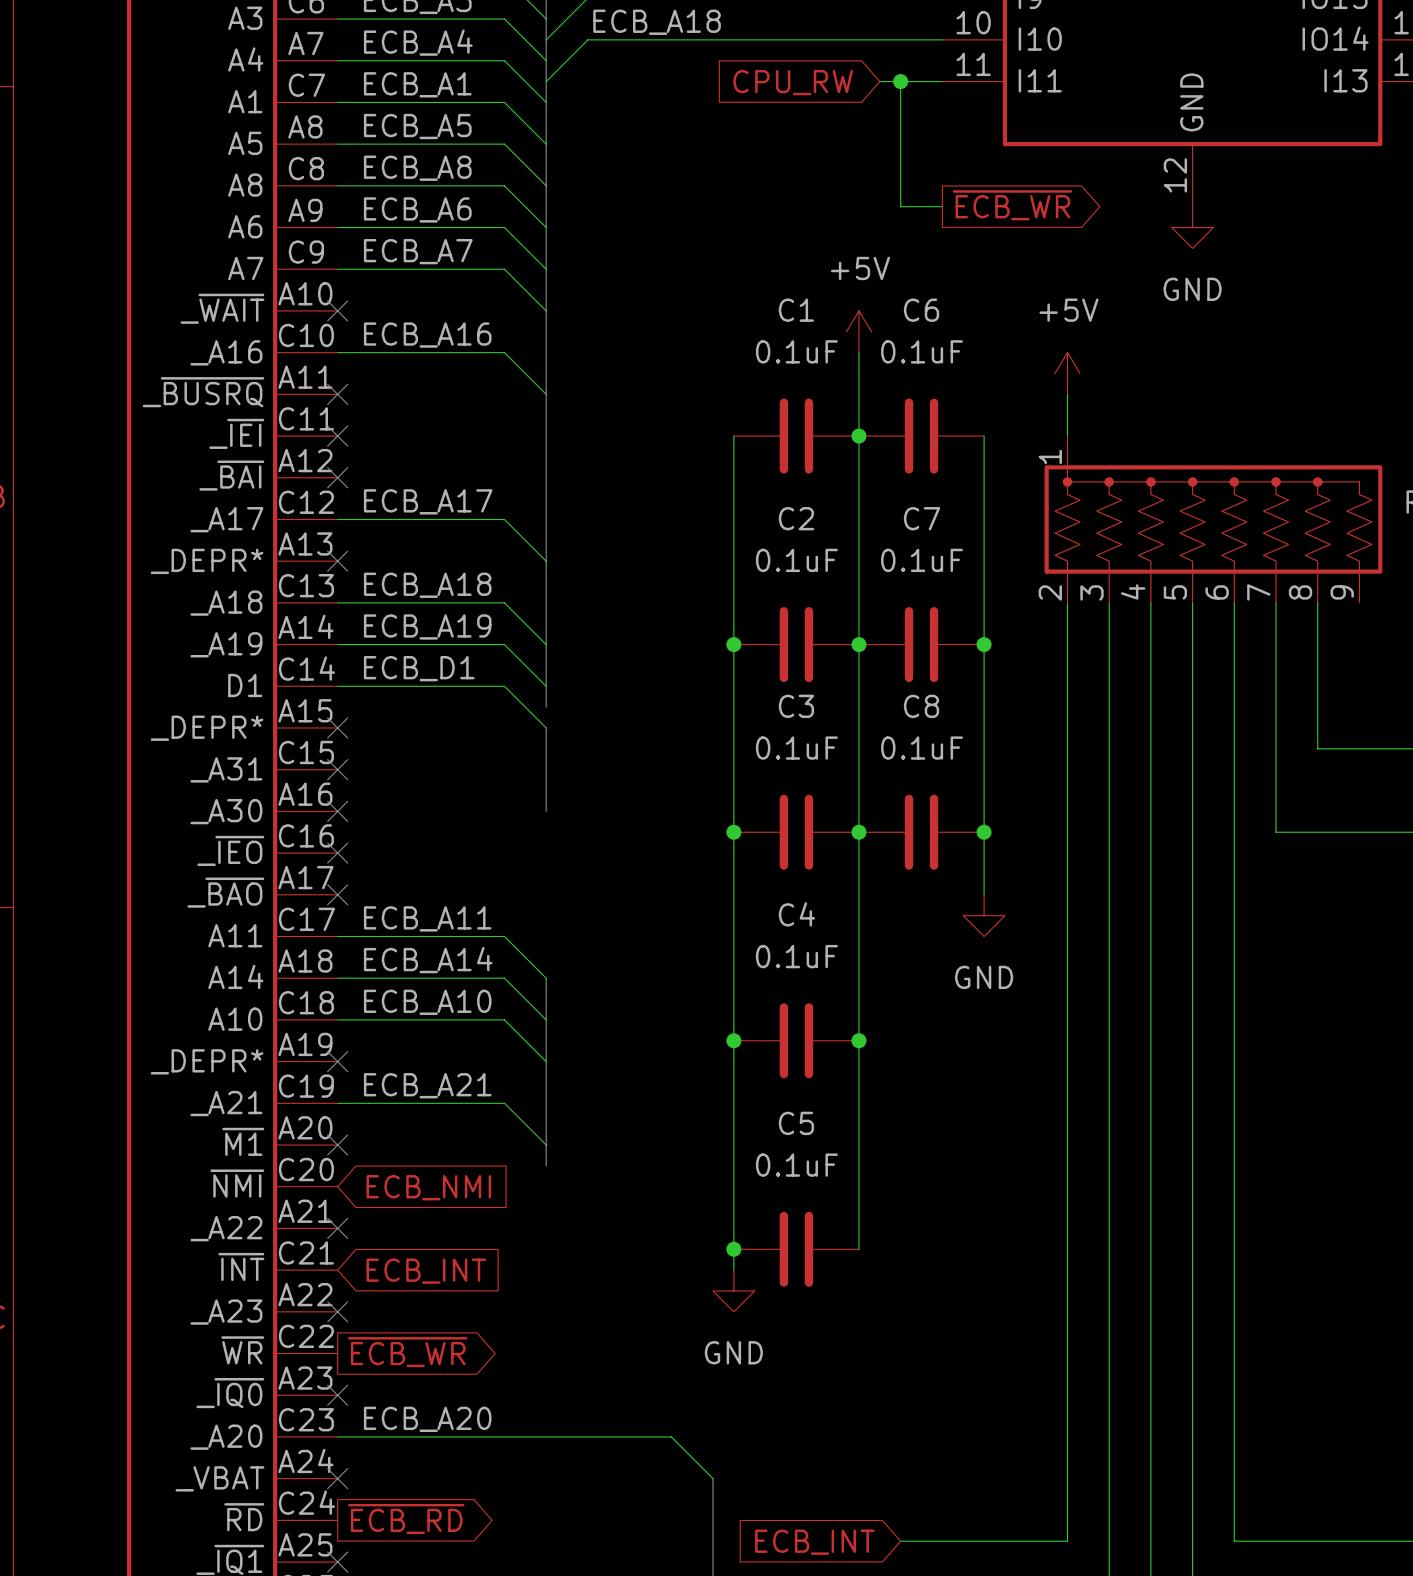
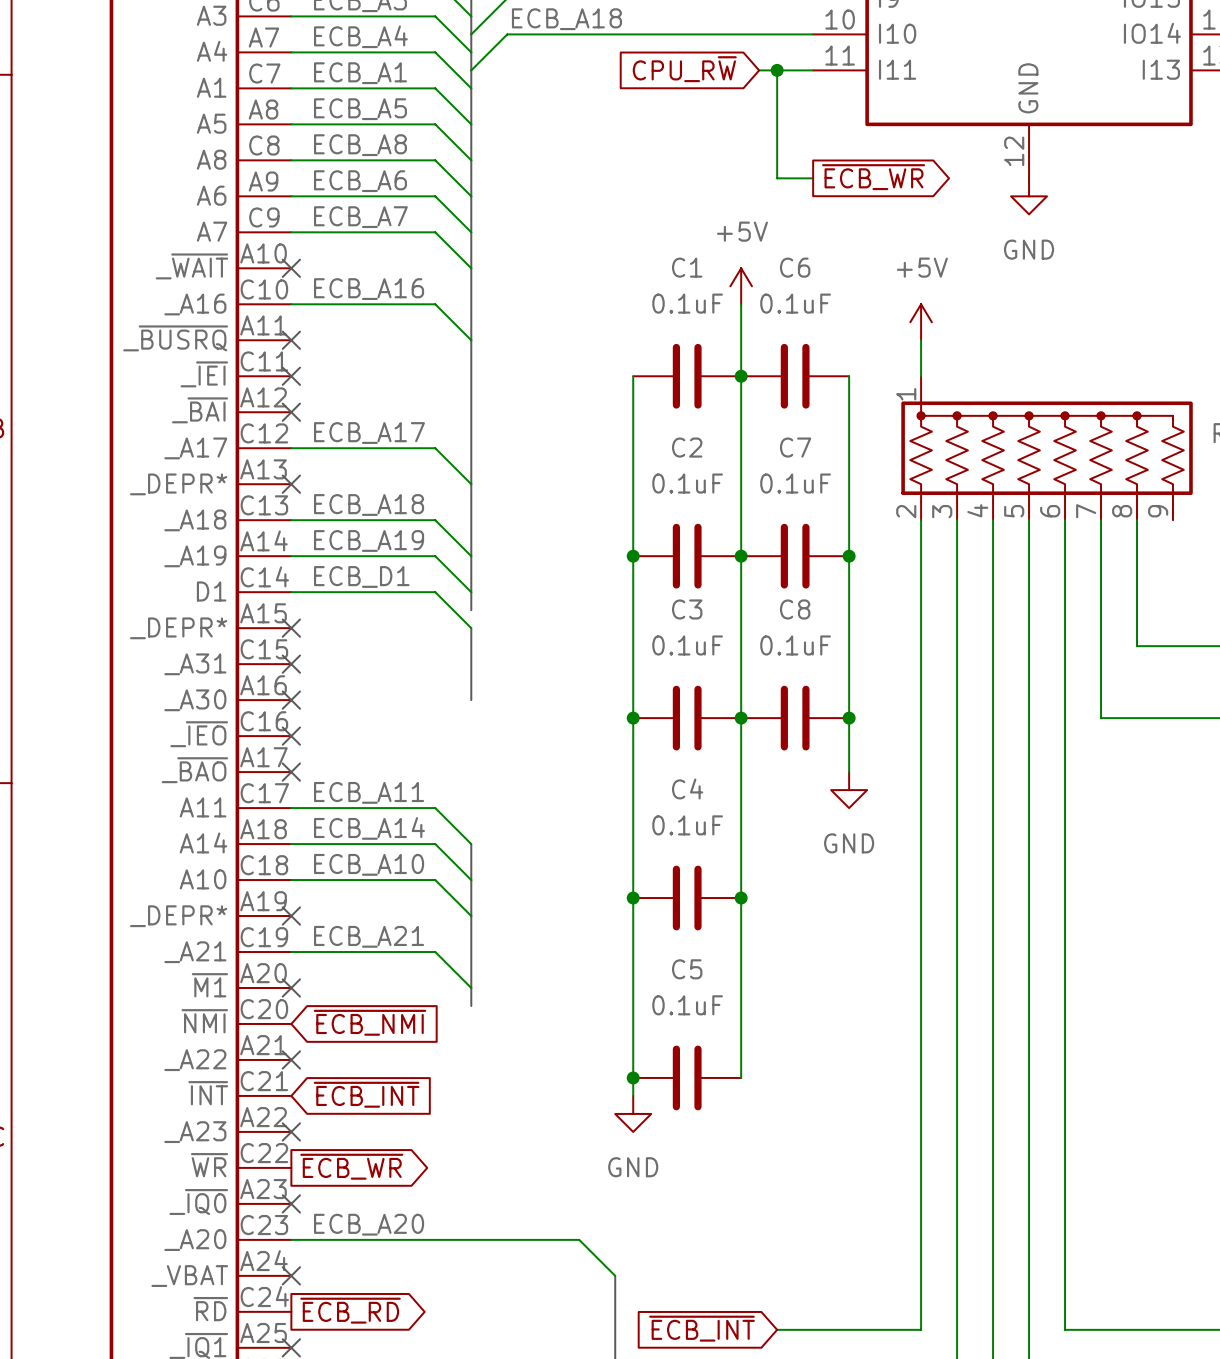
global label: CPU_RW (793, 82) -> CPU_R~{W} (684, 69)
global label: ECB_NMI (428, 1187) -> ~{ECB_NMI} (370, 1022)
global label: ECB_INT (426, 1271) -> ~{ECB_INT} (366, 1094)
global label: ECB_INT (815, 1542) -> ~{ECB_INT} (701, 1328)

